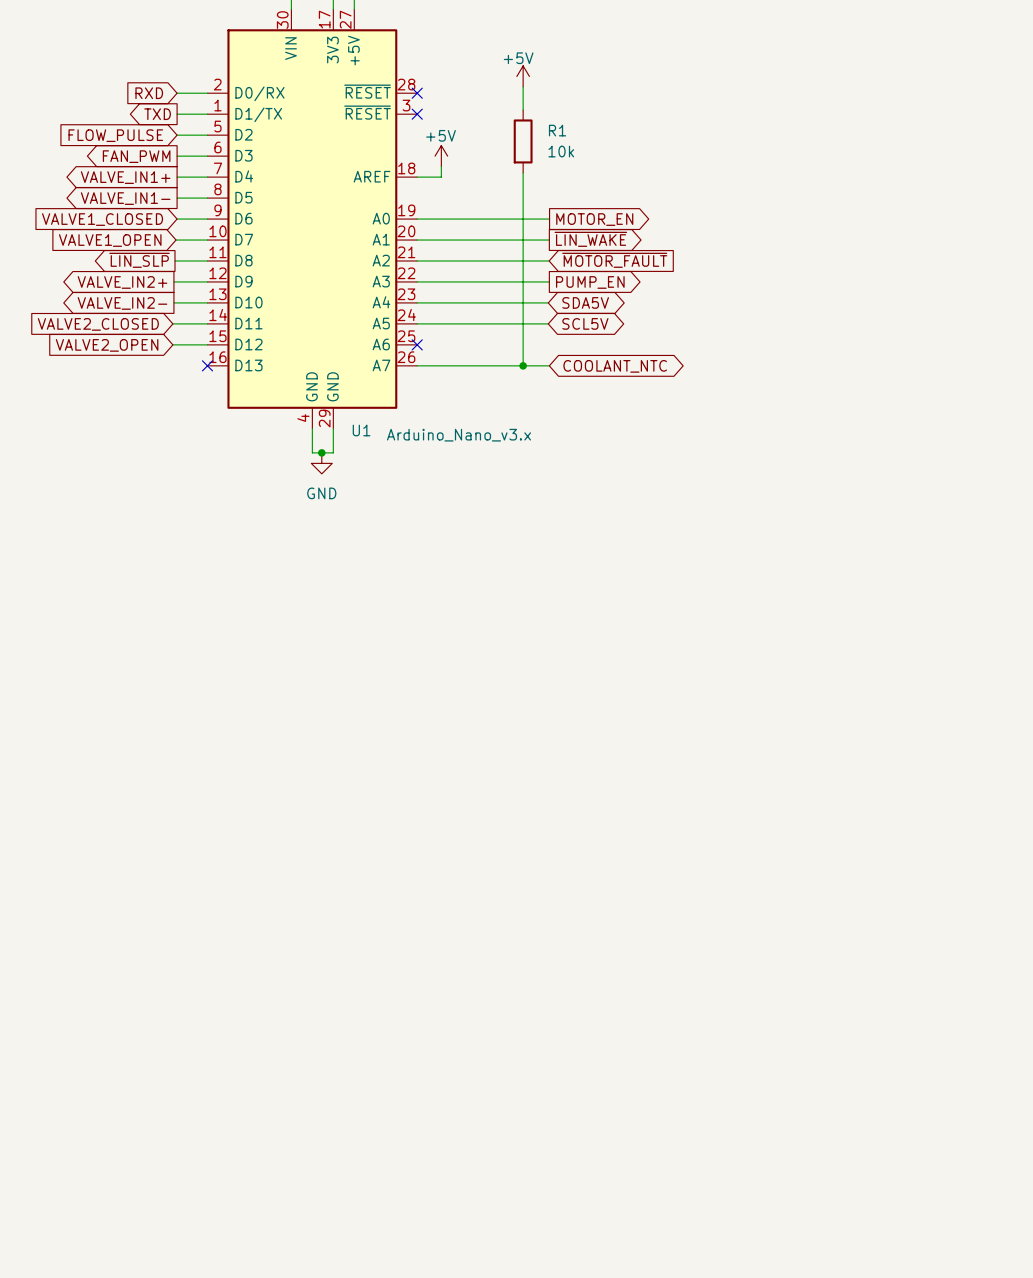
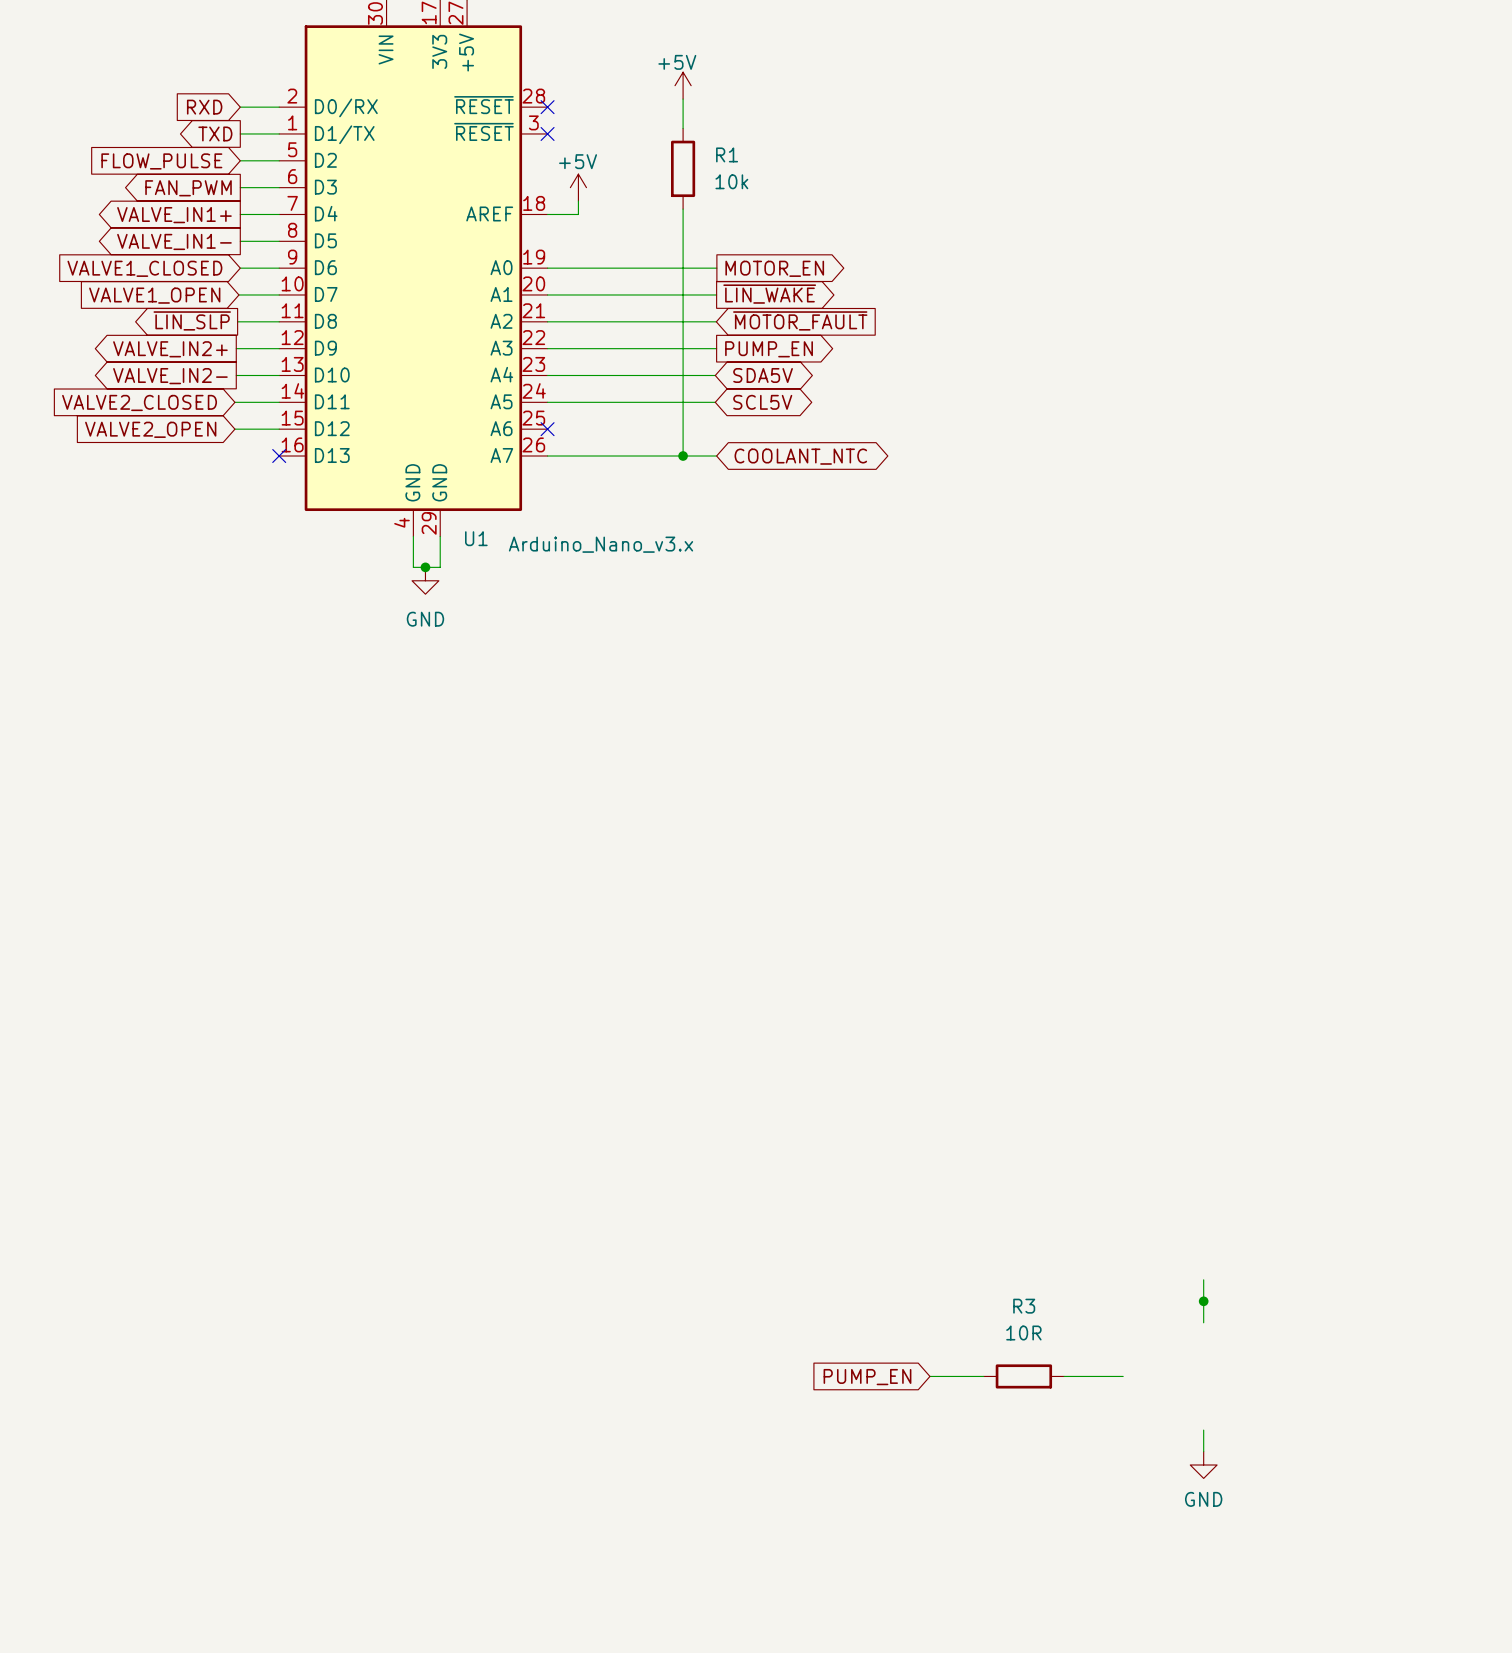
wire: none -> (1203, 1279) (1203, 1322)
junction: none -> (1203, 1301)
global label: none -> PUMP_EN (867, 1377)
wire: none -> (929, 1376) (983, 1376)
R3: none -> 10R (1023, 1376)
wire: none -> (1064, 1376) (1123, 1376)
wire: none -> (1203, 1430) (1203, 1451)
power symbol: none -> GND (1203, 1465)

